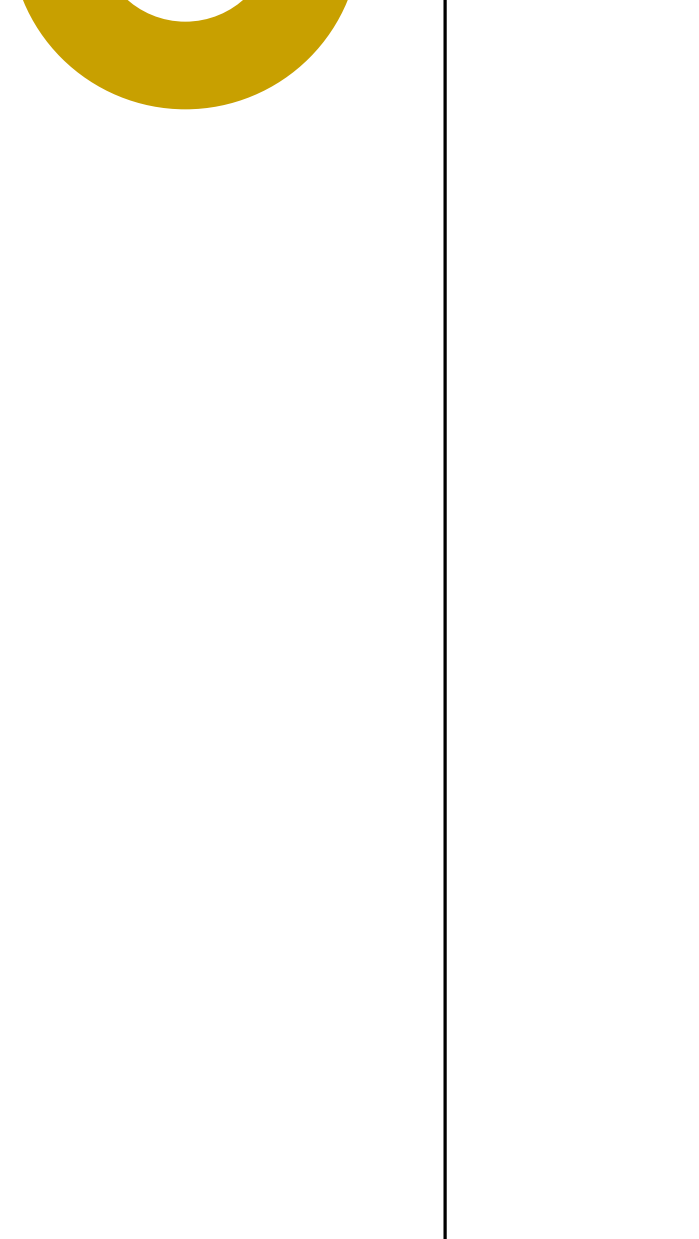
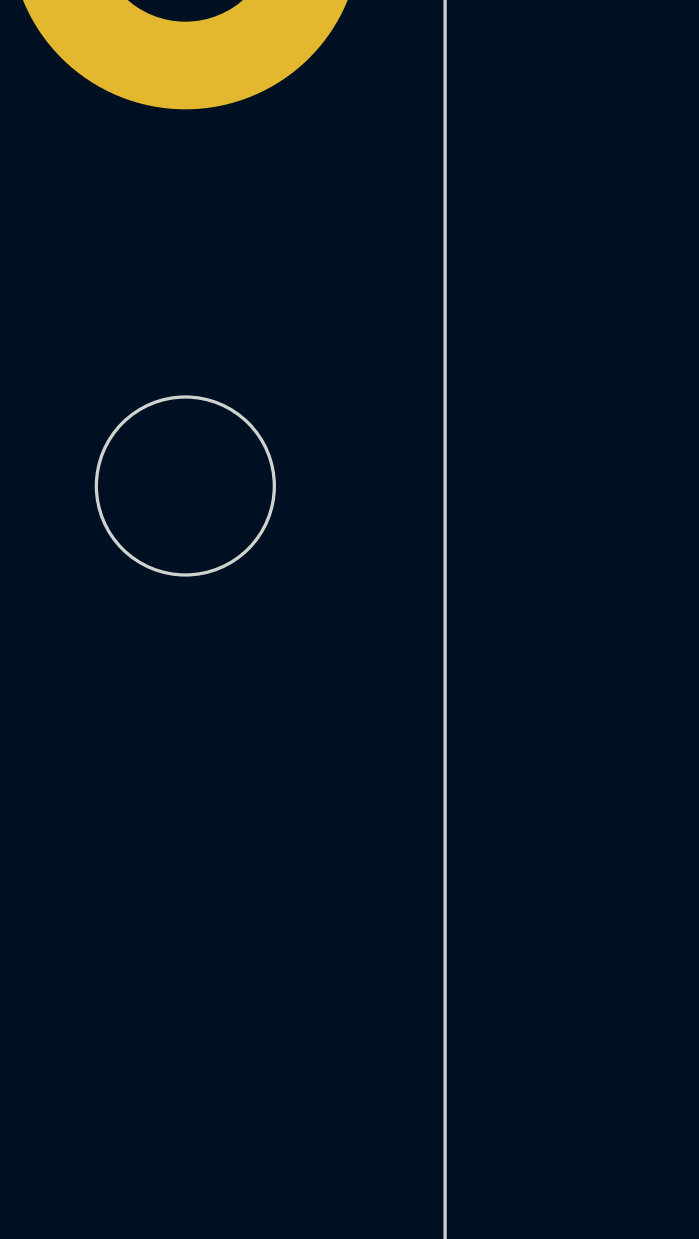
round board edge: none -> [94, 395, 276, 577]

